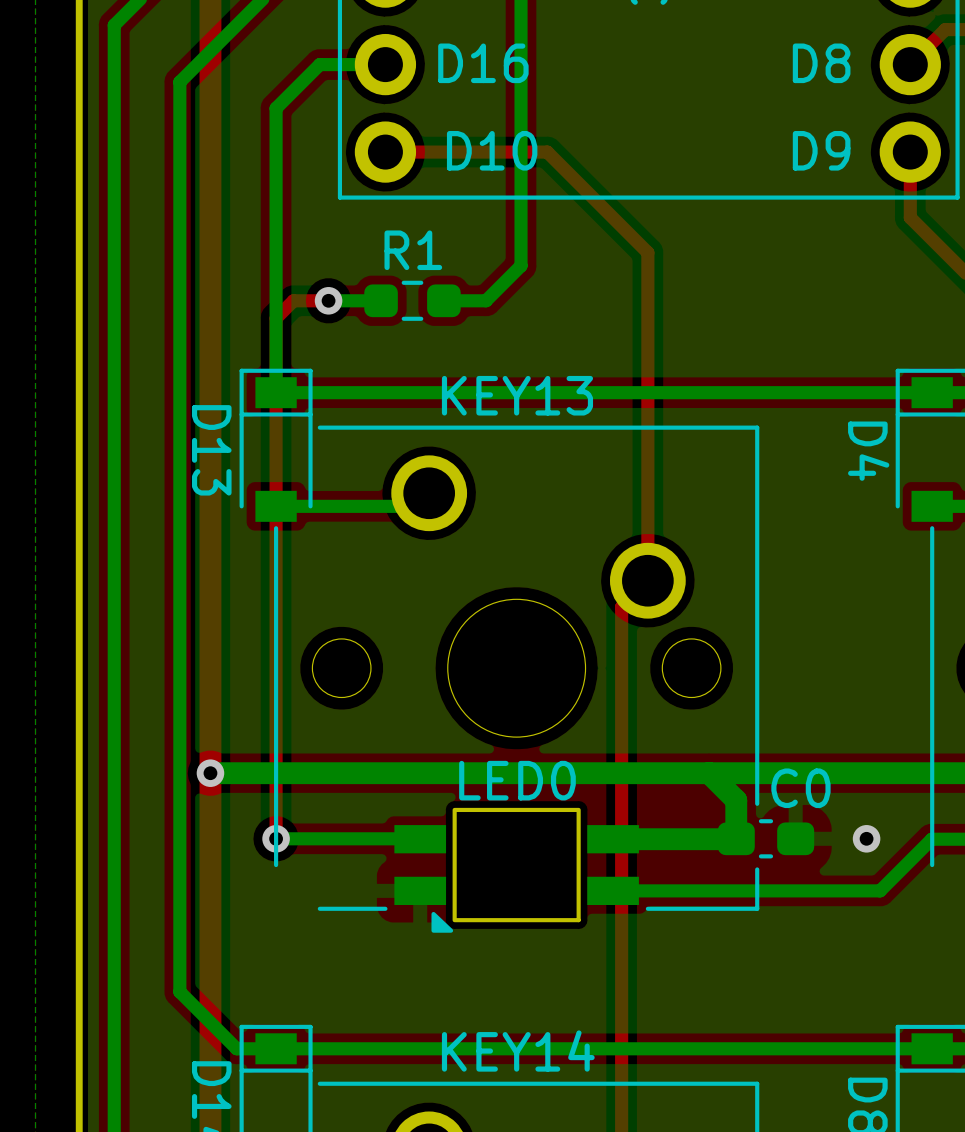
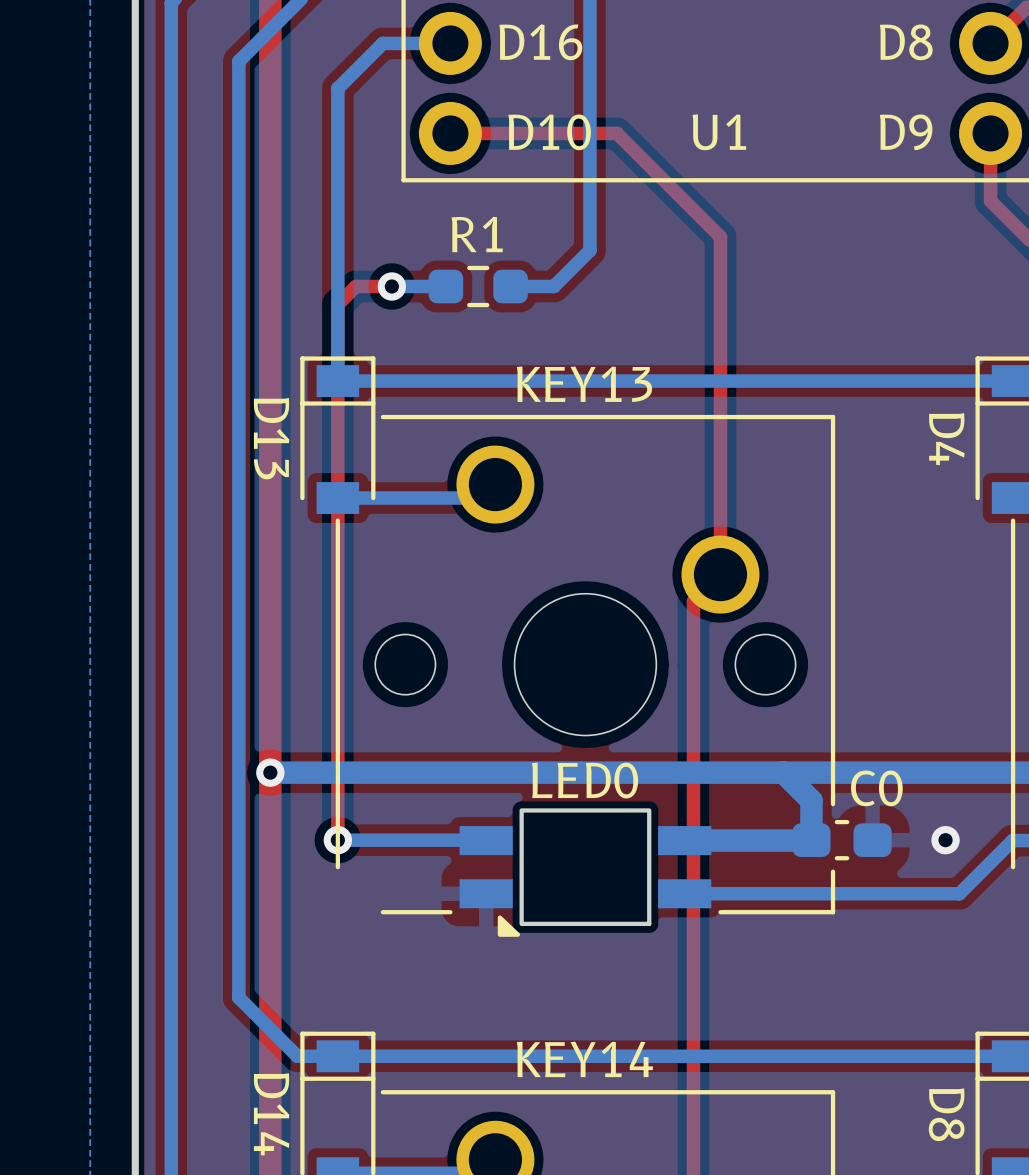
U1 name: none -> U1 (719, 132)

